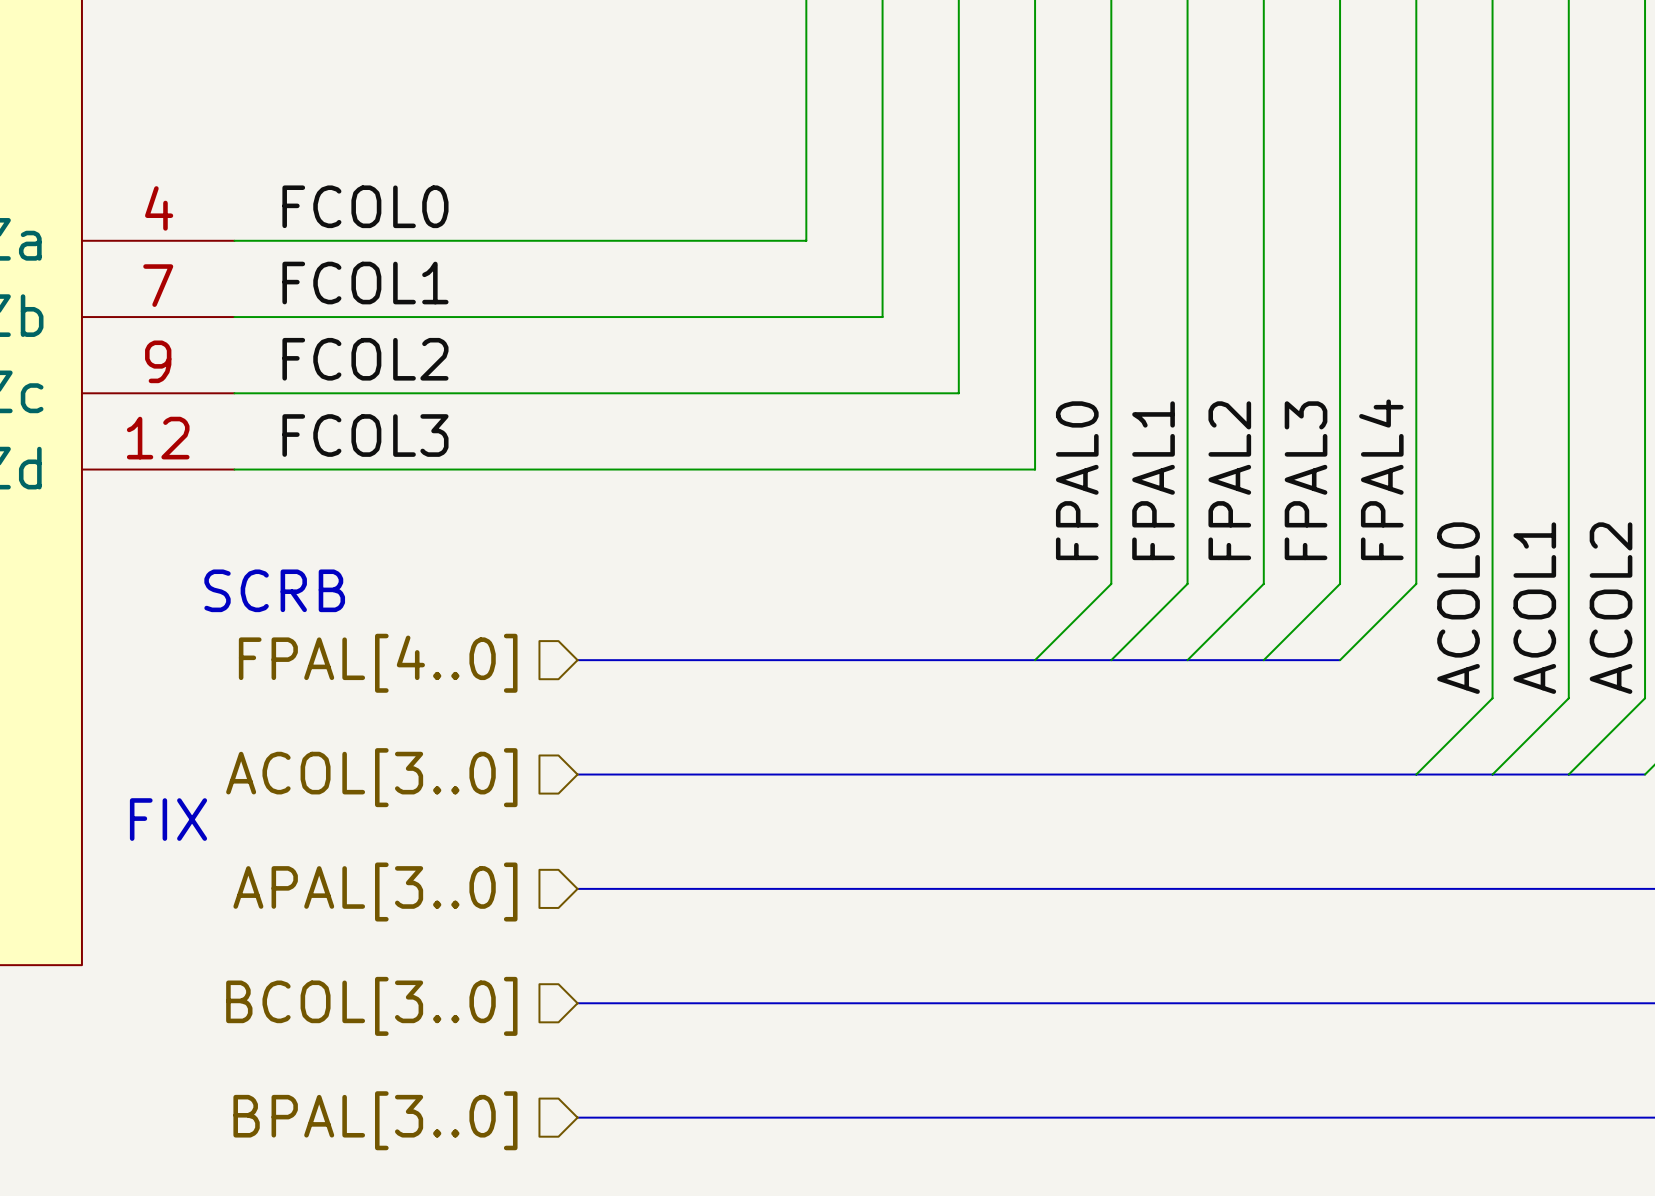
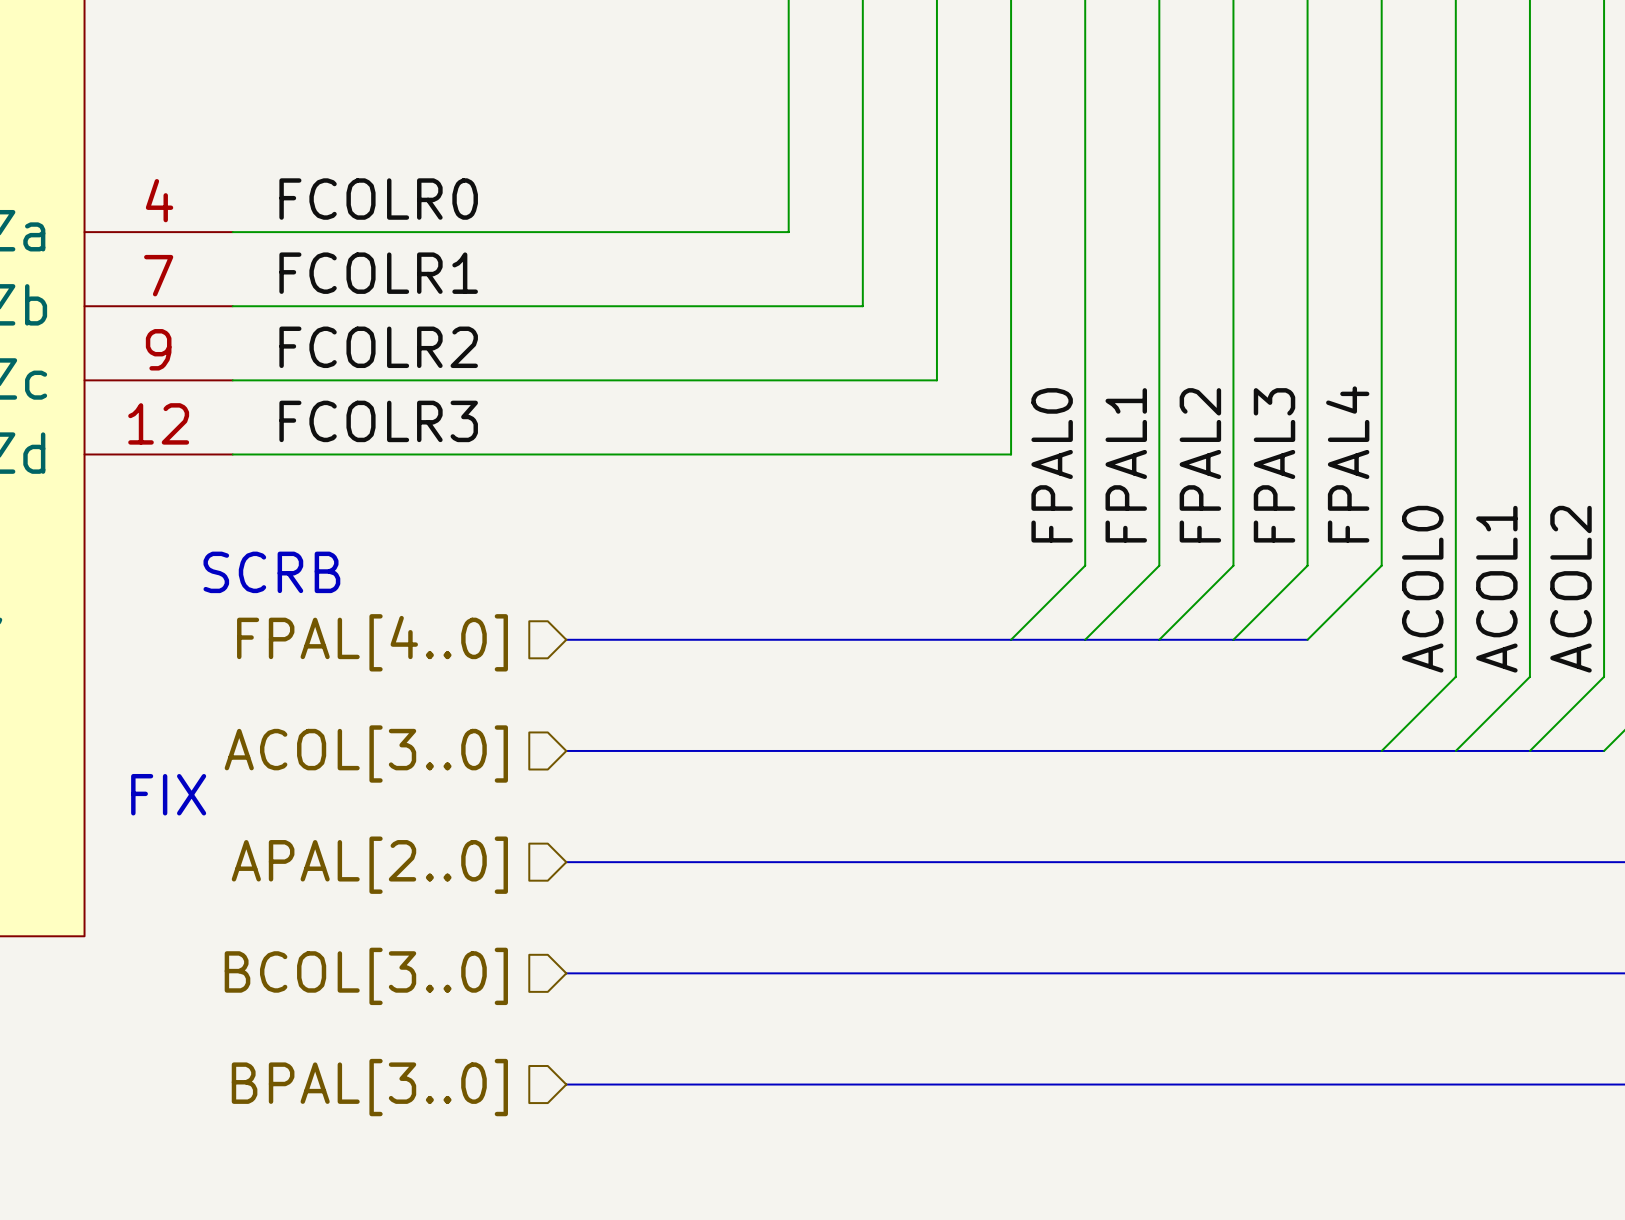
label: FCOL0 (365, 206) -> FCOLR0 (378, 199)
label: FCOL1 (365, 283) -> FCOLR1 (378, 273)
label: FCOL2 (365, 359) -> FCOLR2 (378, 347)
label: FCOL3 (365, 435) -> FCOLR3 (378, 421)
hierarchical label: APAL[3..0] (375, 892) -> APAL[2..0] (369, 865)

